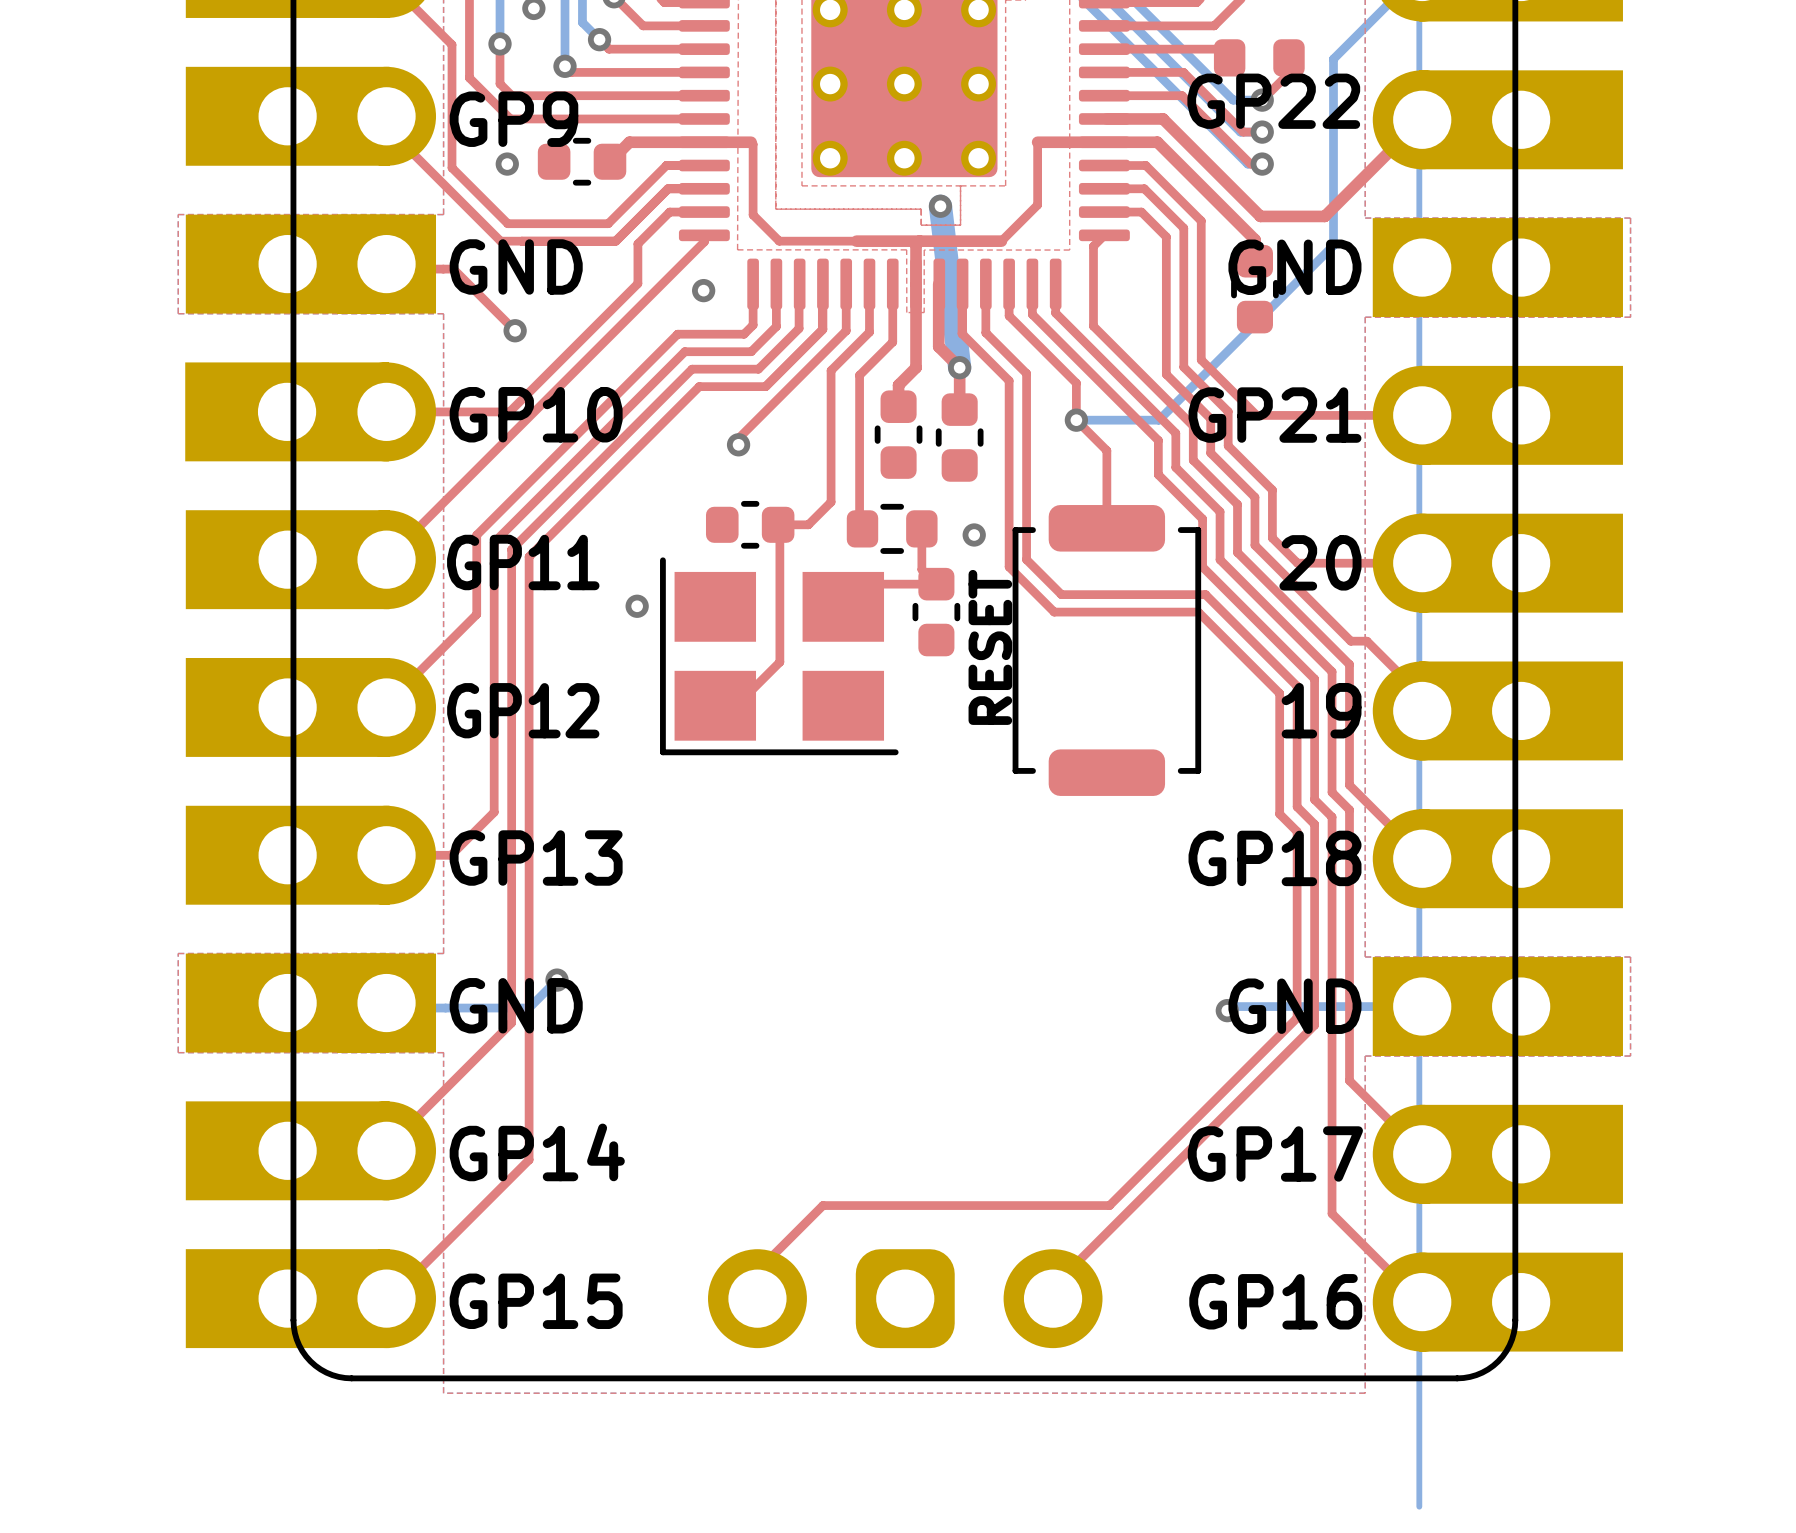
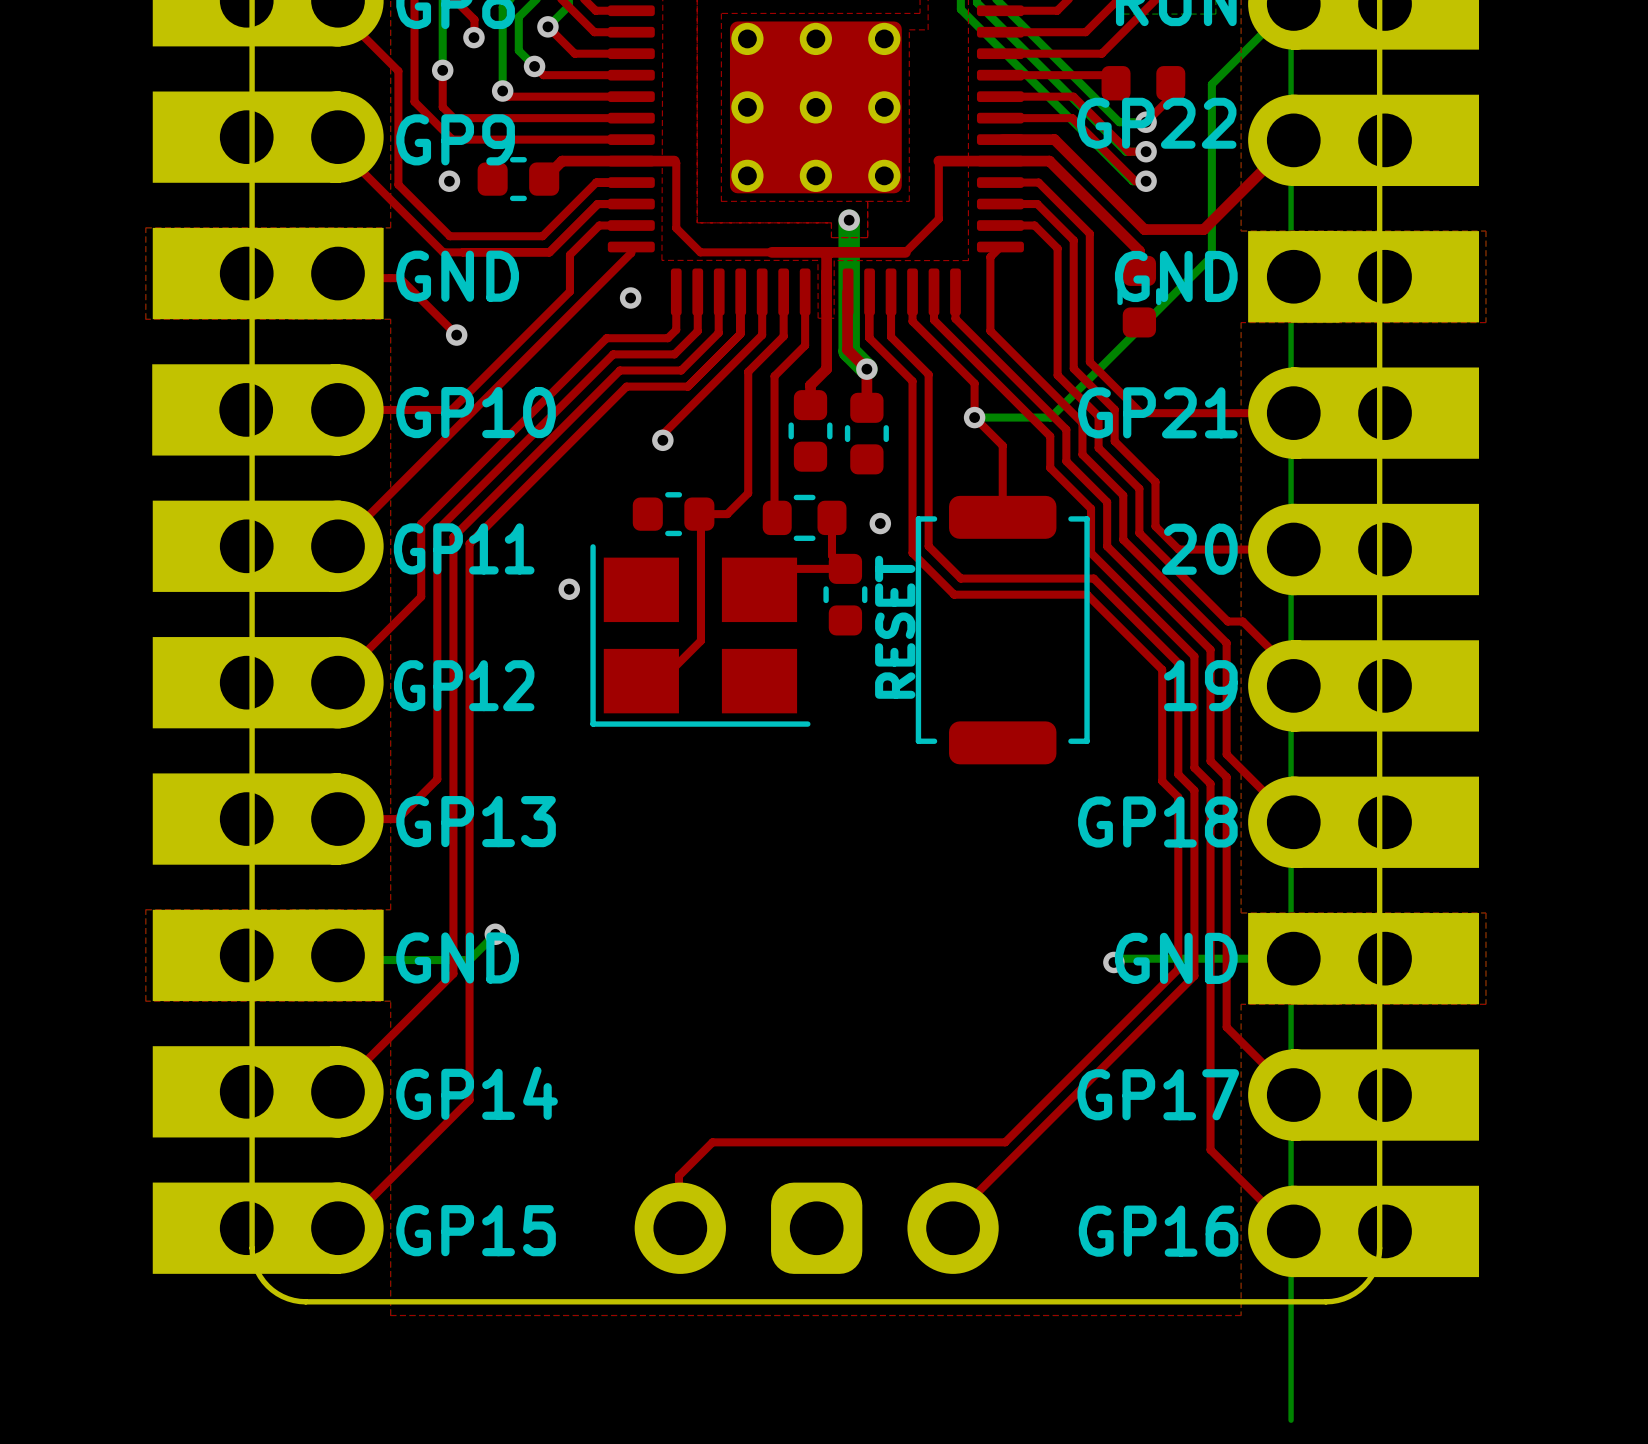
bottom track: (940, 206) (959, 367) -> (849, 220) (849, 351) (866, 369)
top track: (822, 1205) (757, 1271) (756, 1298) -> (740, 1142) (712, 1142) (678, 1175) (678, 1228)

